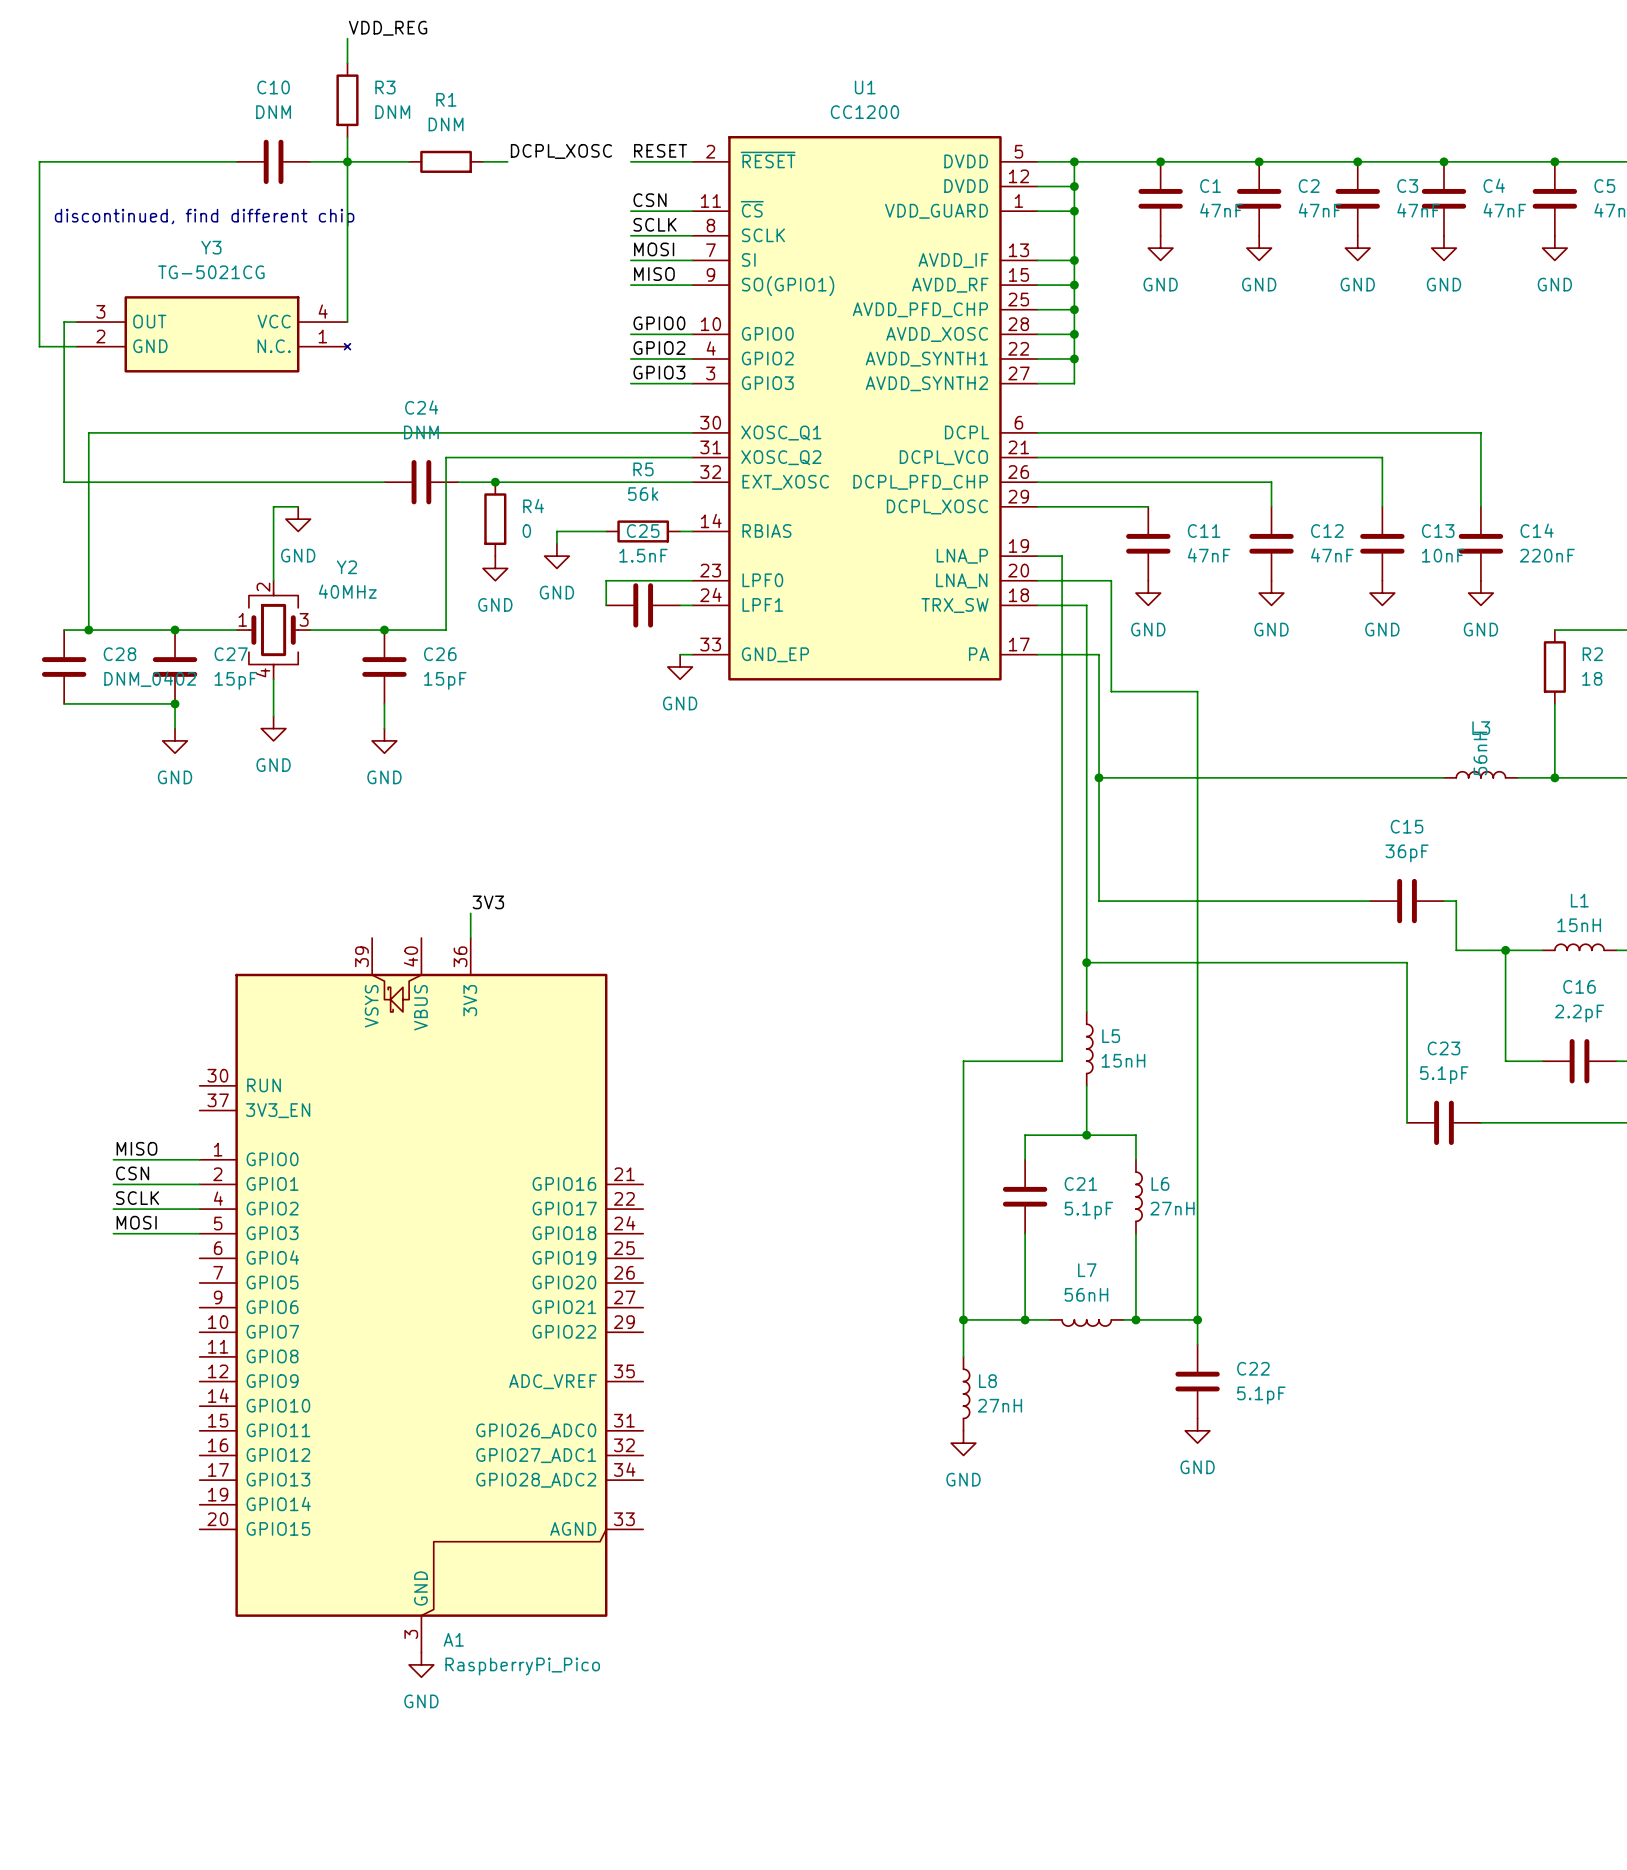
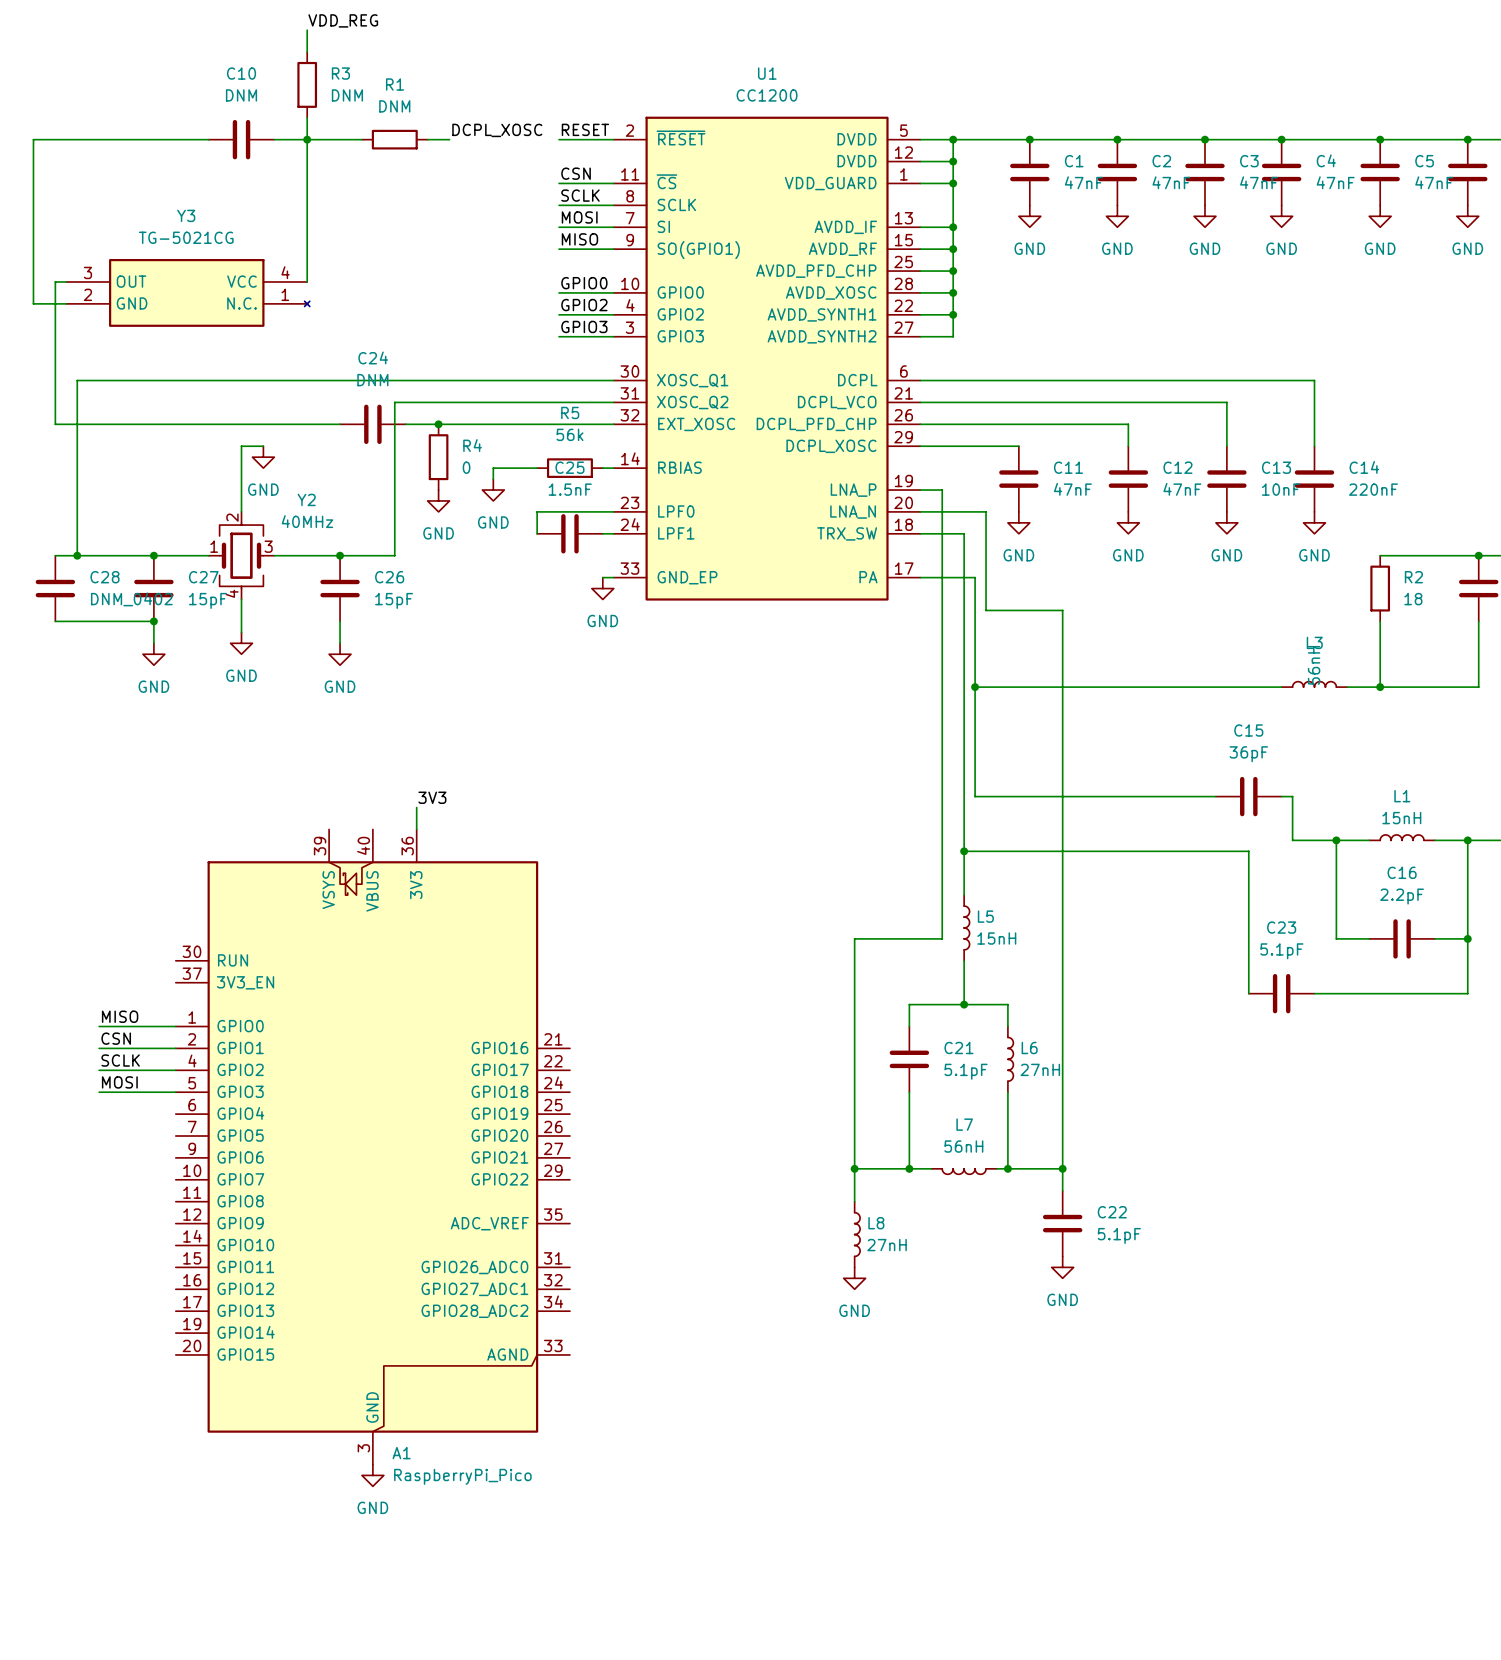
text: discontinued, find different chip (204, 217) -> none

